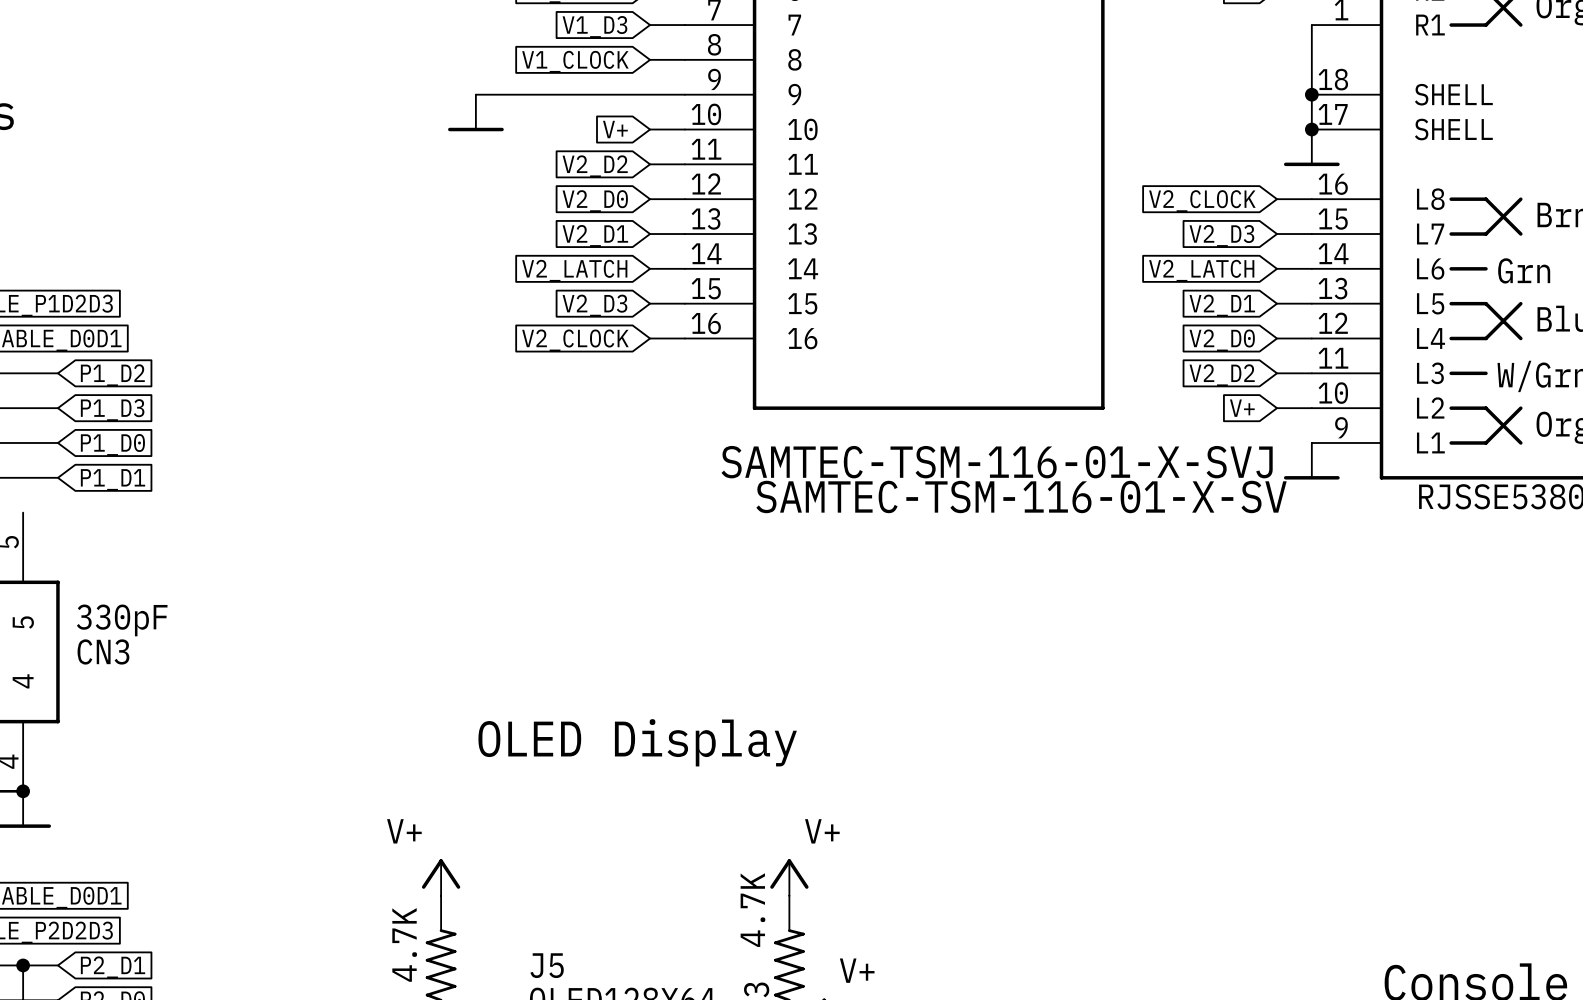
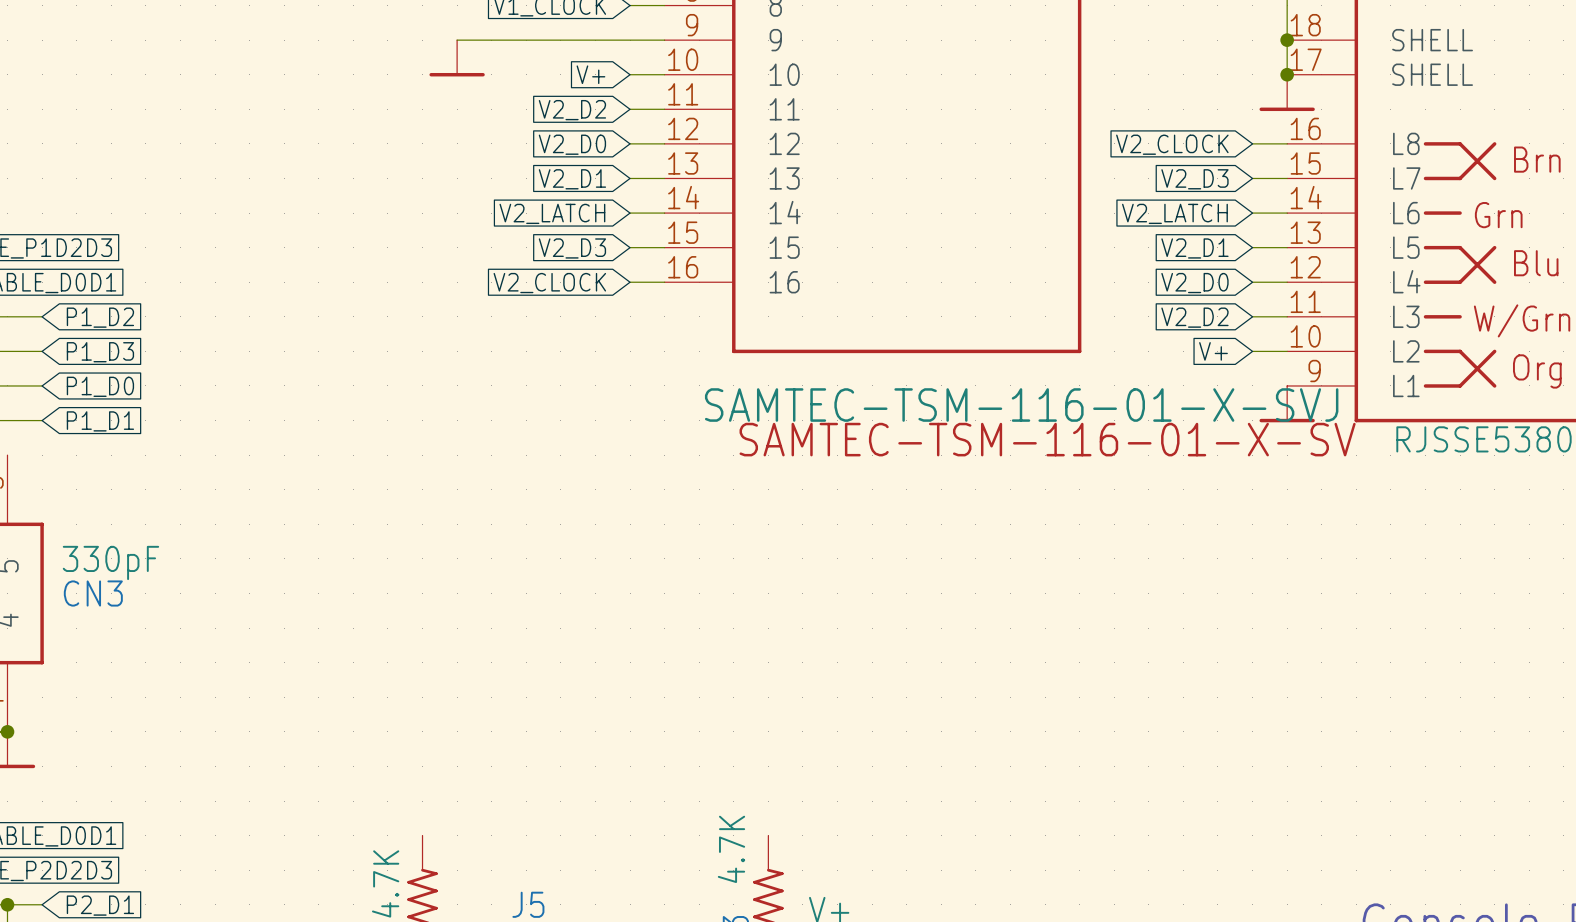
text: OLED Display (637, 742) -> none
power symbol: V+ (441, 877) -> none
power symbol: V+ (789, 877) -> none

